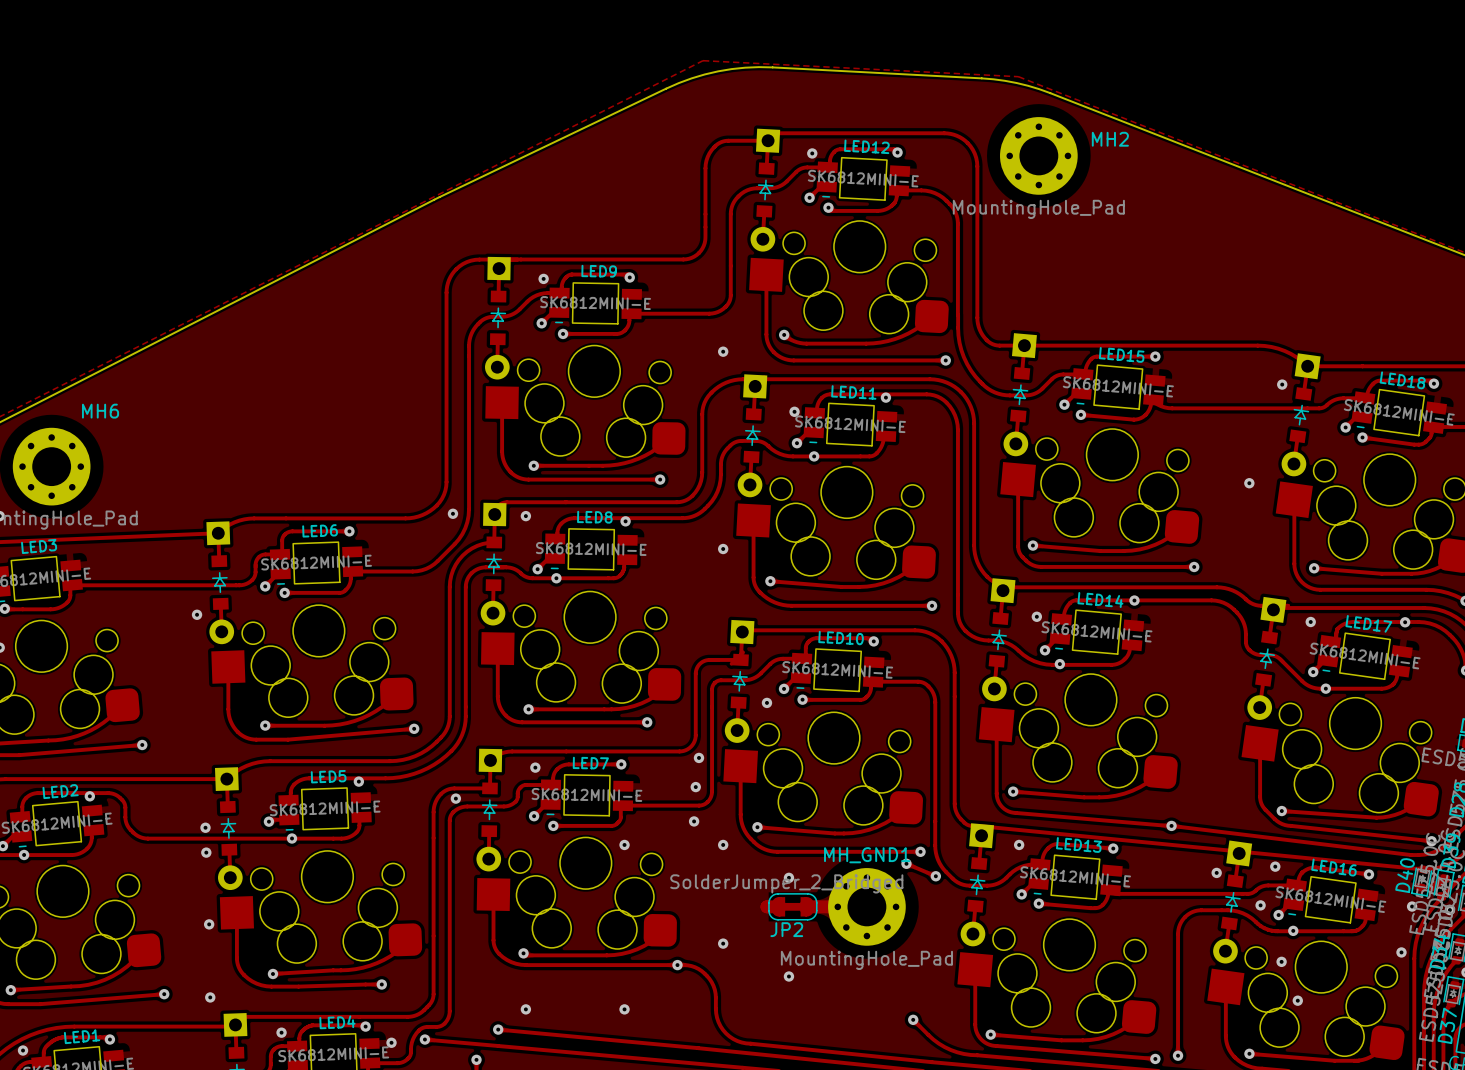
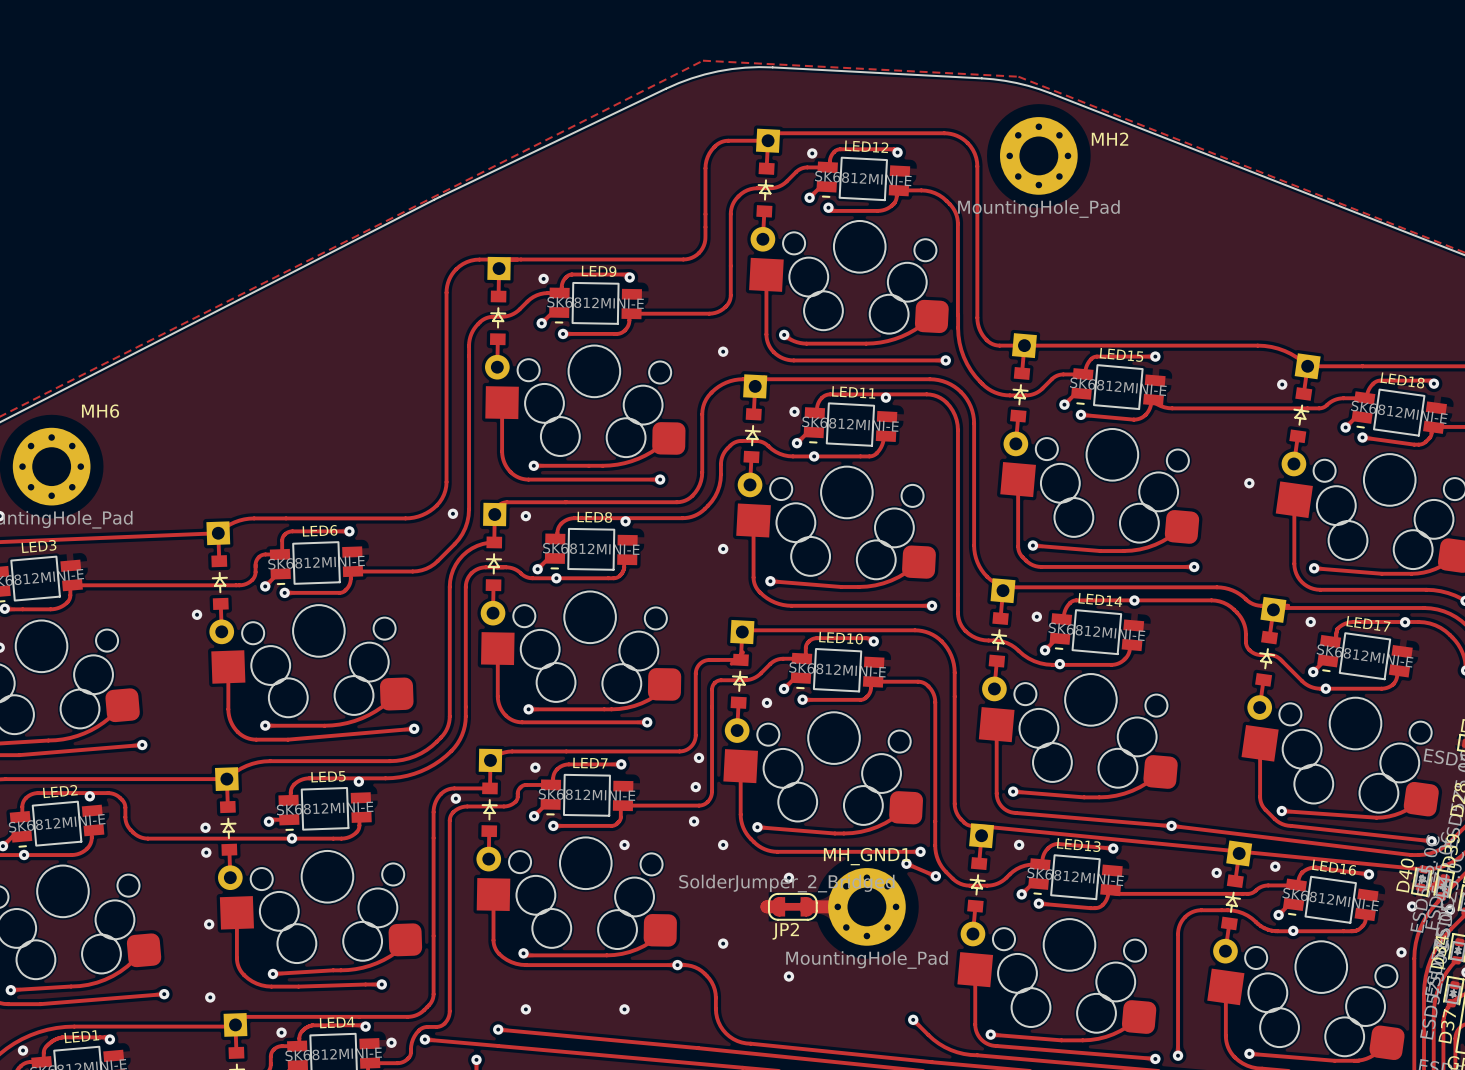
via: (1260, 905) -> none
via: (1281, 961) -> none
via: (1297, 1000) -> none

